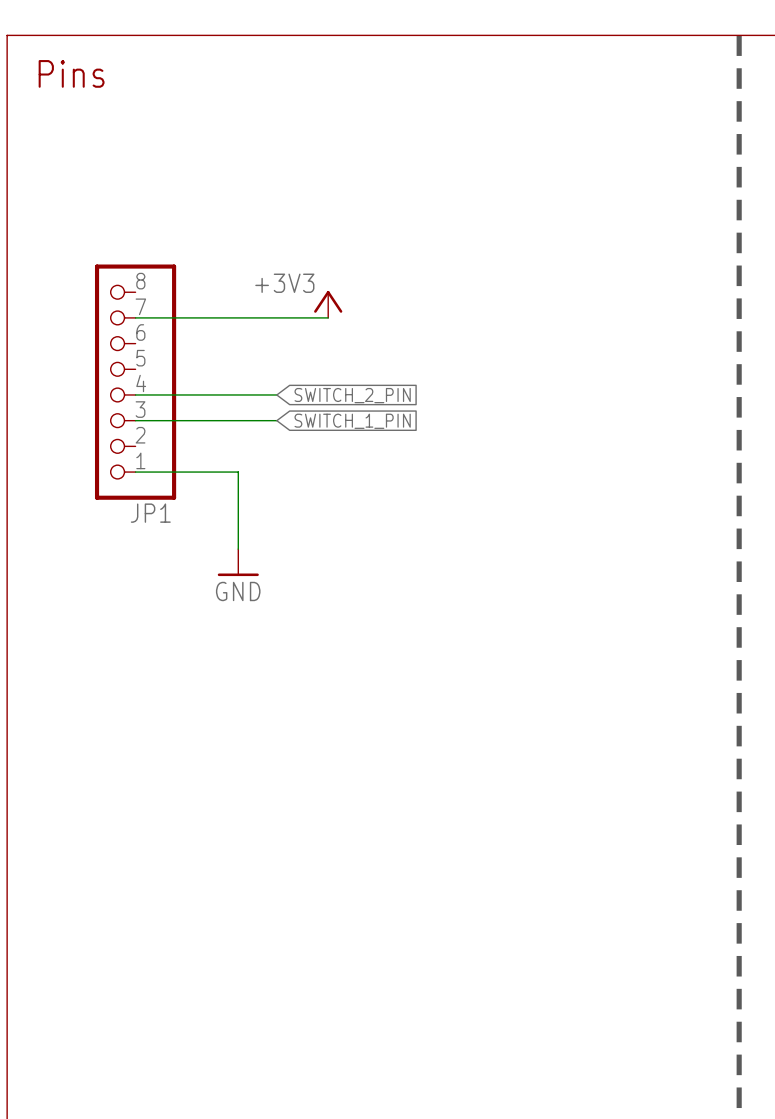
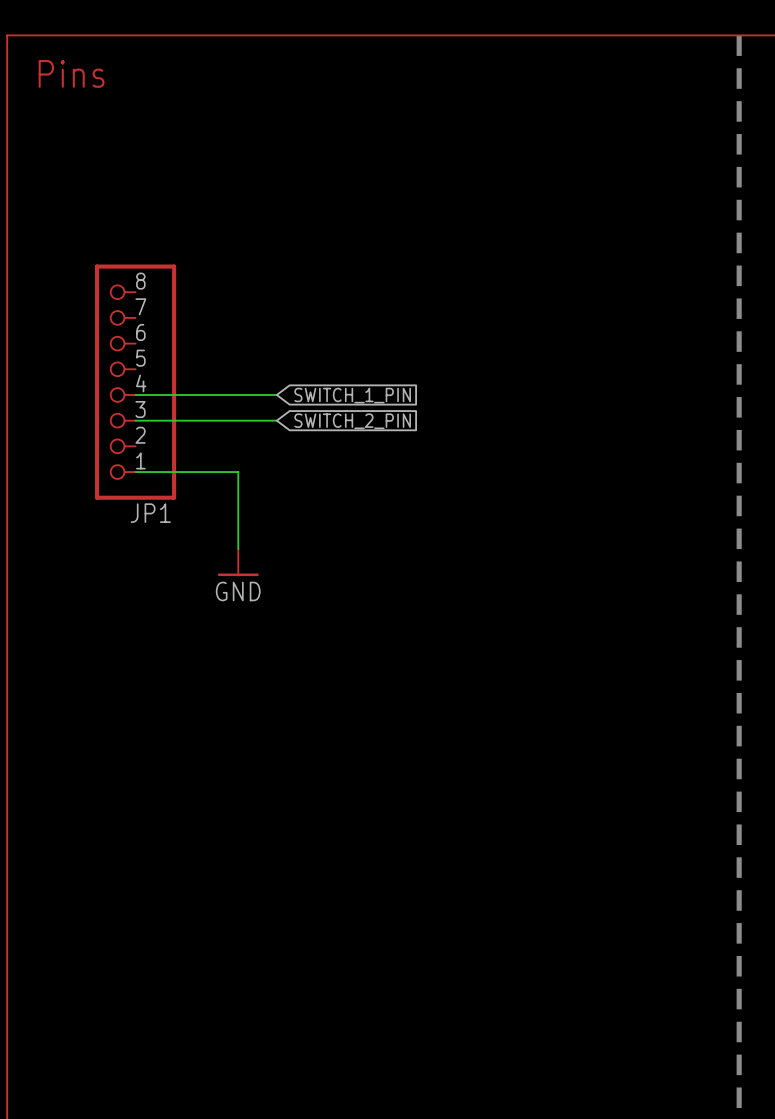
power symbol: +3V3 (328, 304) -> none
wire: (135, 317) (328, 317) -> none
global label: SWITCH_2_PIN (352, 395) -> SWITCH_1_PIN (352, 395)
global label: SWITCH_1_PIN (352, 421) -> SWITCH_2_PIN (352, 421)

